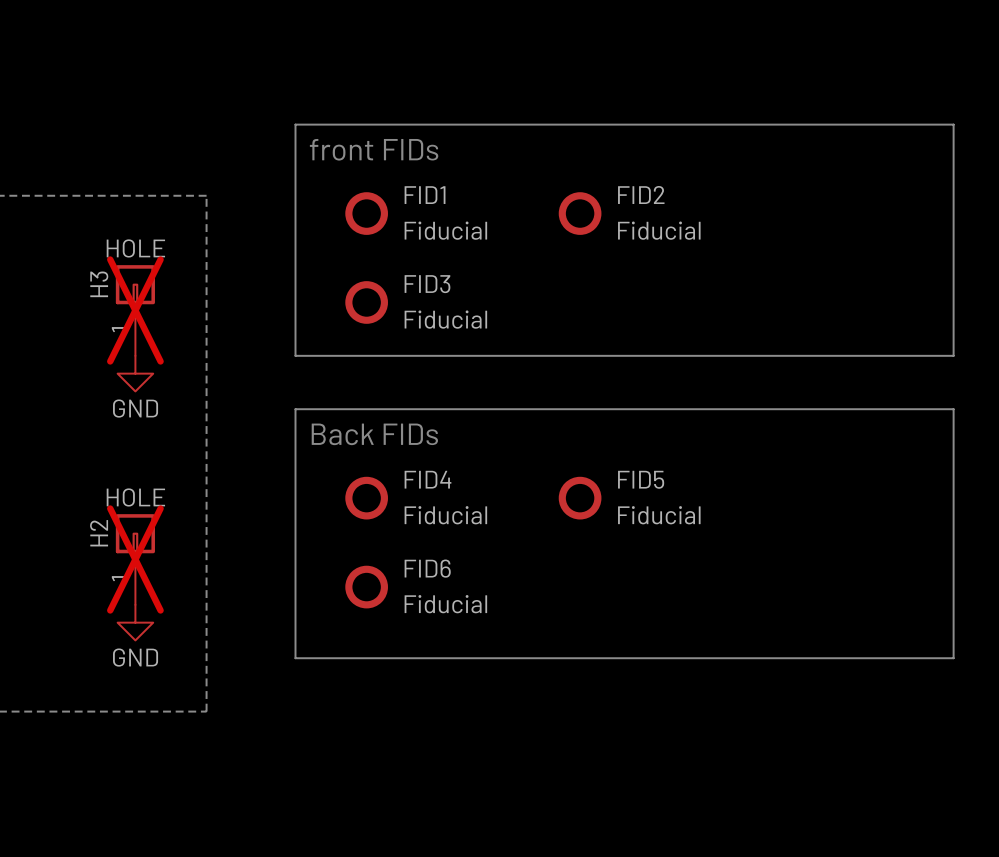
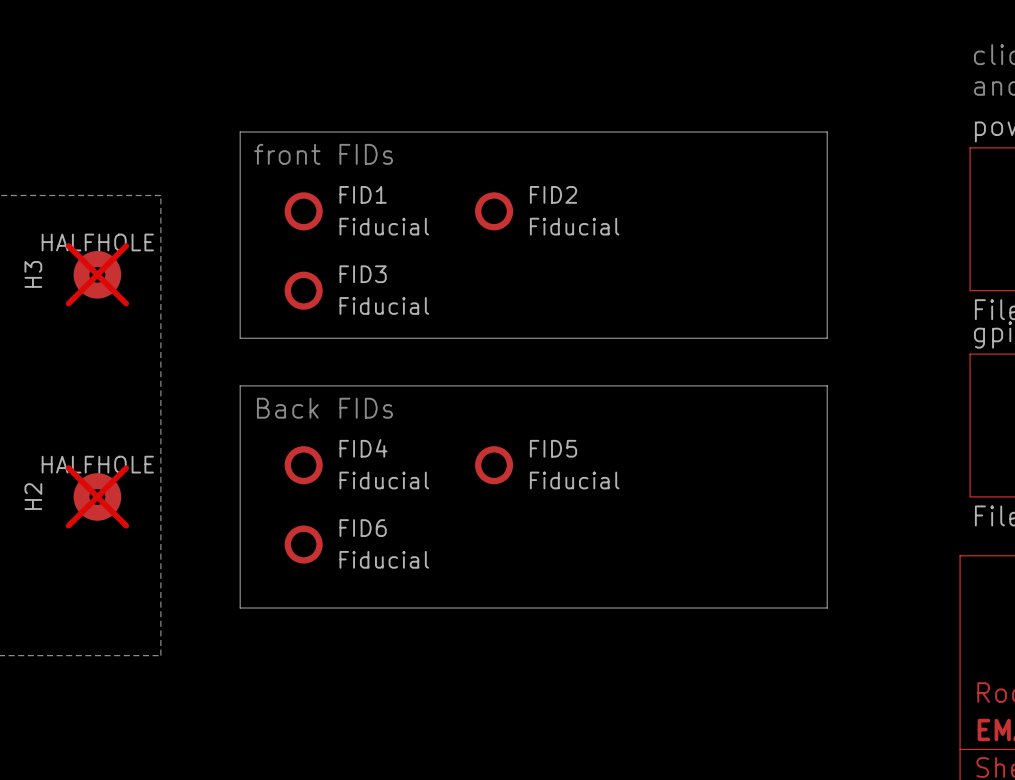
H3 value: HOLE (135, 248) -> HALFHOLE (97, 242)
H3 symbol: [115, 265, 155, 356] -> [73, 251, 122, 299]
H3 name position: H3 (99, 284) -> H3 (33, 274)
power symbol: GND (135, 373) -> none
H2 value: HOLE (135, 497) -> HALFHOLE (97, 464)
H2 symbol: [115, 514, 155, 605] -> [73, 473, 122, 521]
H2 name position: H2 (99, 533) -> H2 (33, 496)
power symbol: GND (135, 622) -> none

